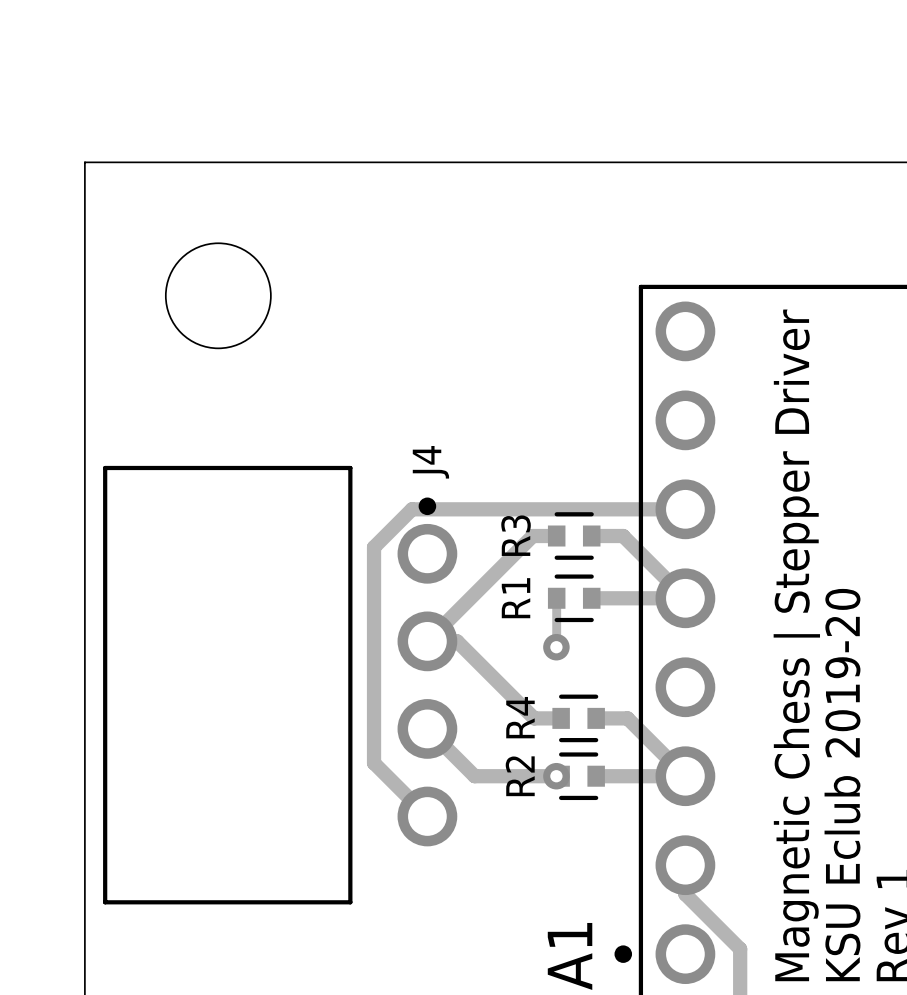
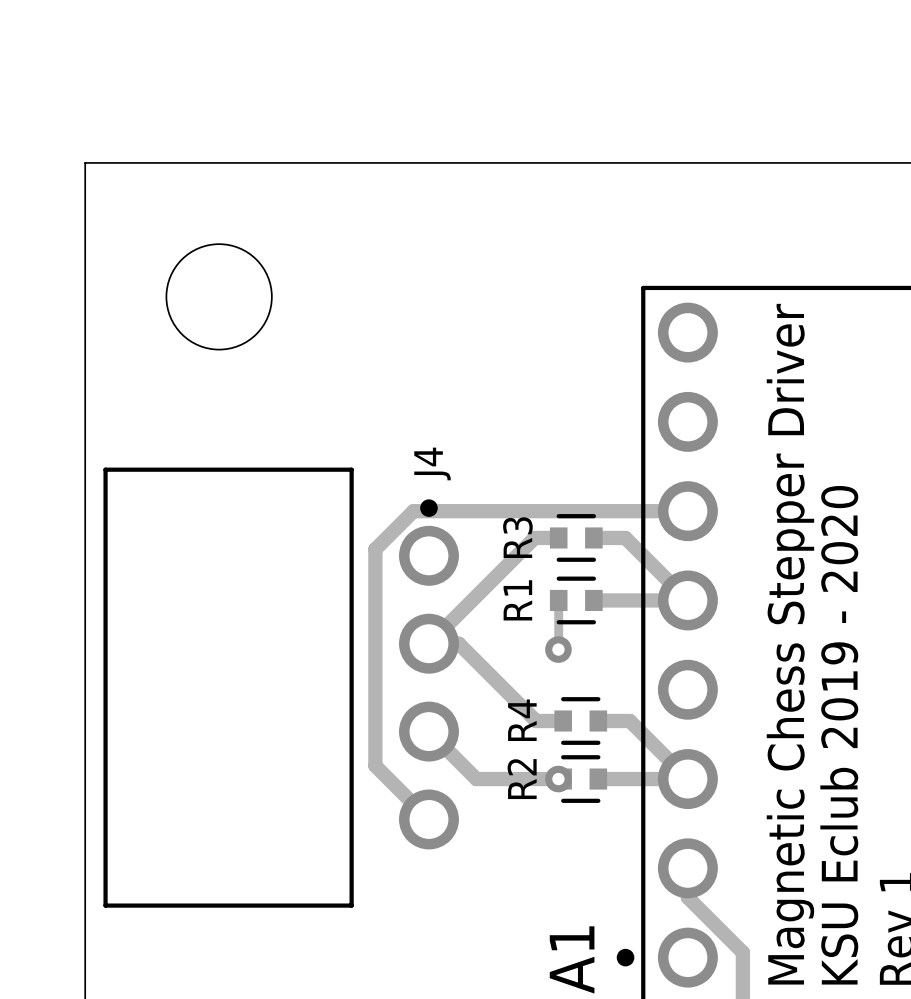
text: Magnetic Chess | Stepper Driver (796, 645) -> Magnetic Chess Stepper Driver (790, 644)
text: KSU Eclub 2019-20 (842, 785) -> KSU Eclub 2019 - 2020 (839, 735)

